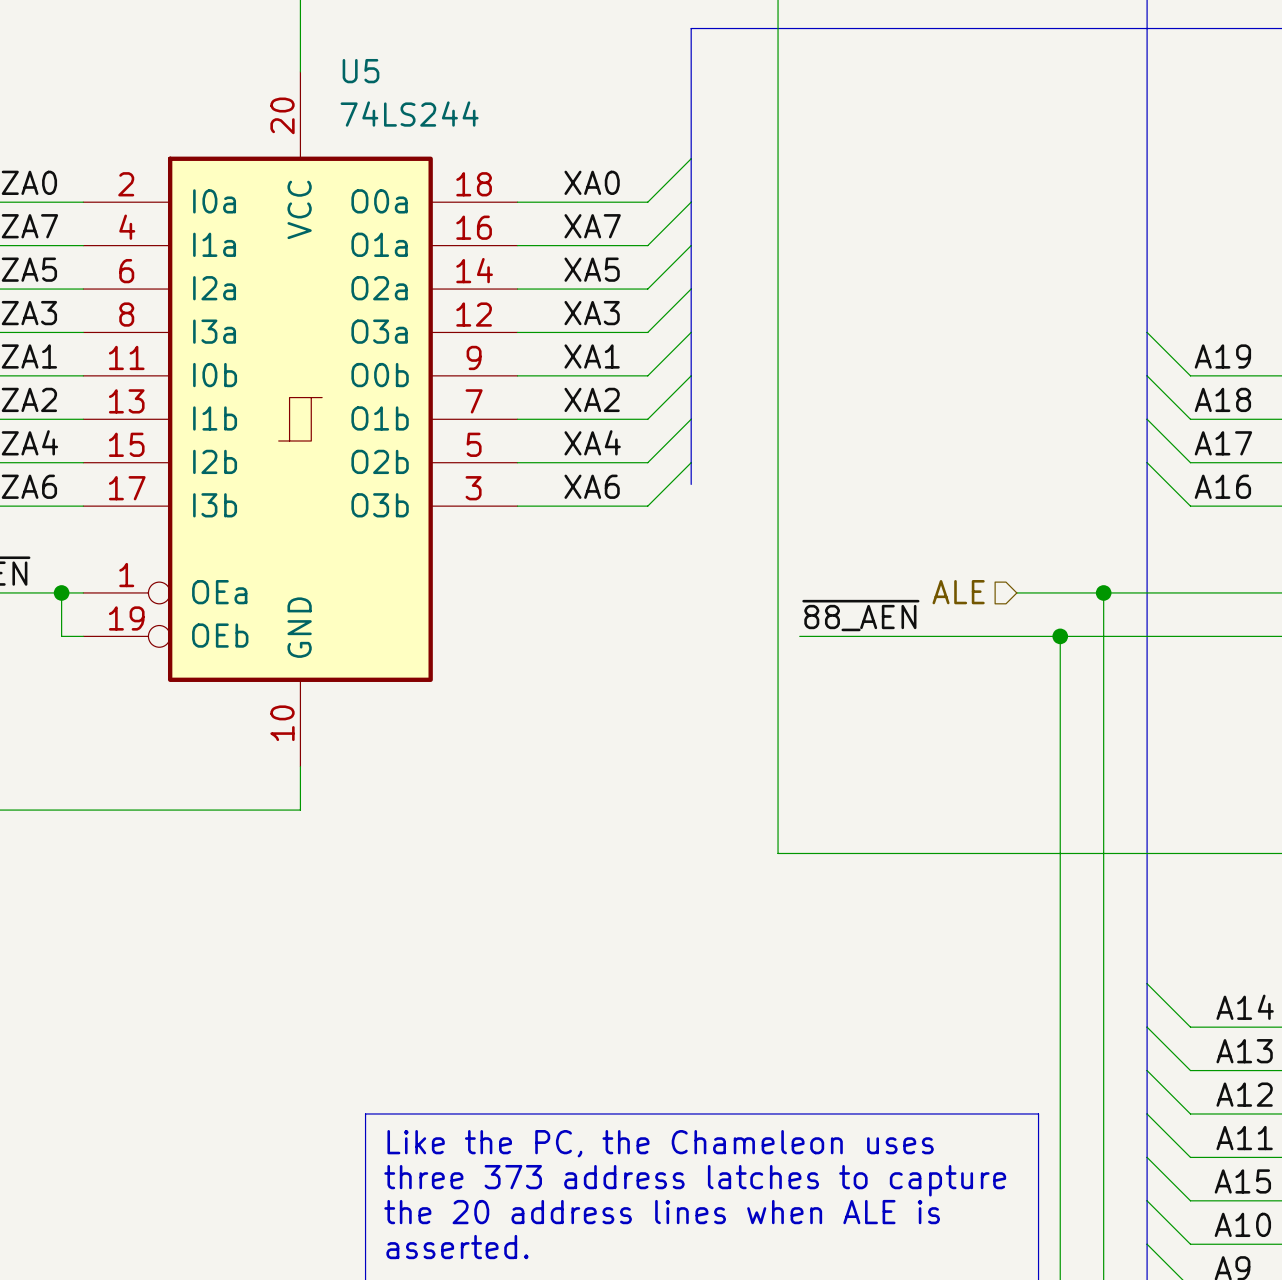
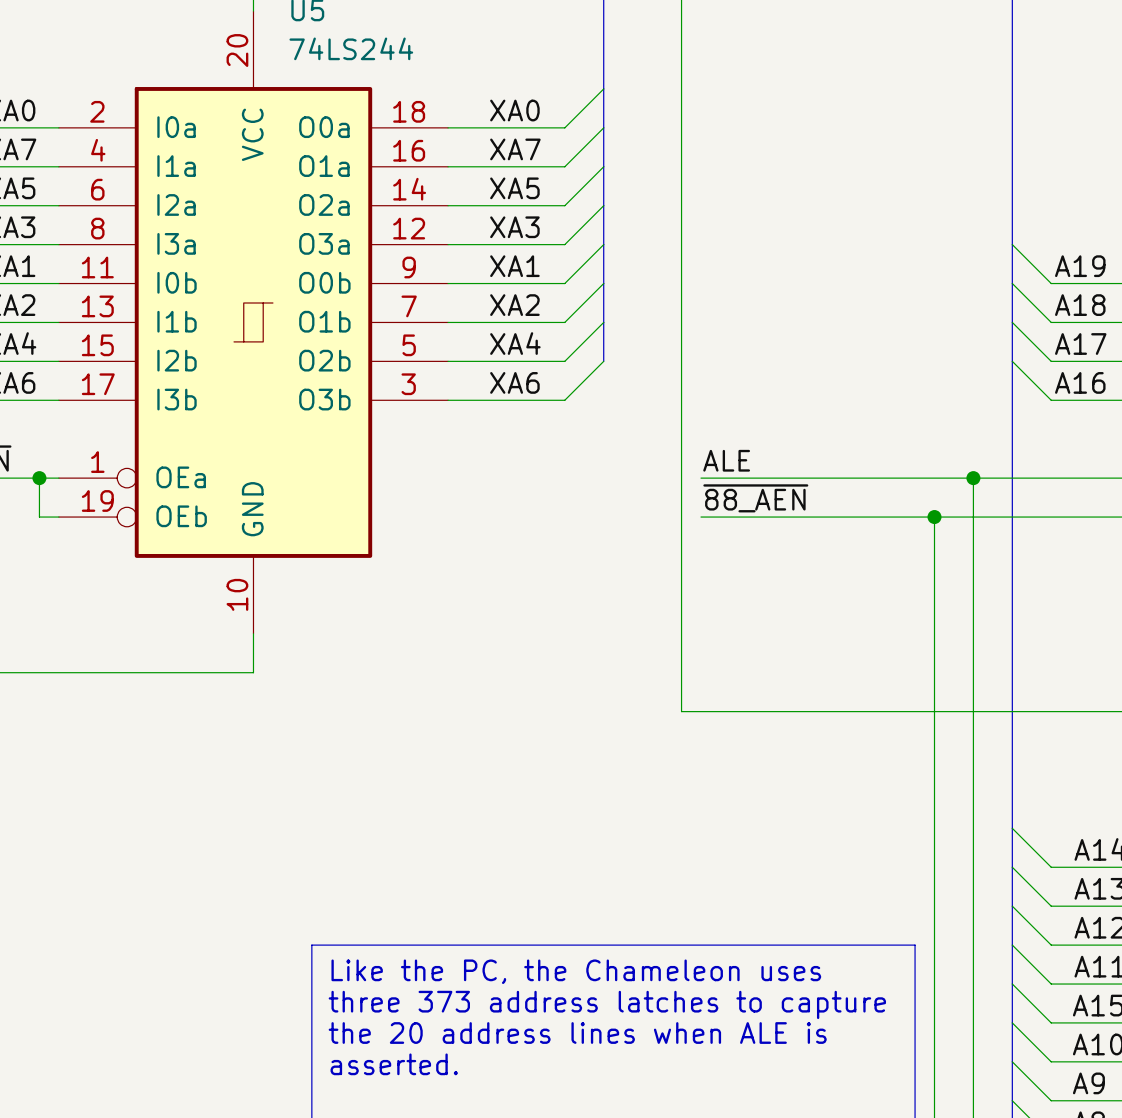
bus: (691, 462) (691, 484) -> none
label: none -> ALE (726, 460)
wire: none -> (701, 478) (895, 478)
hierarchical label: ALE (958, 592) -> none

